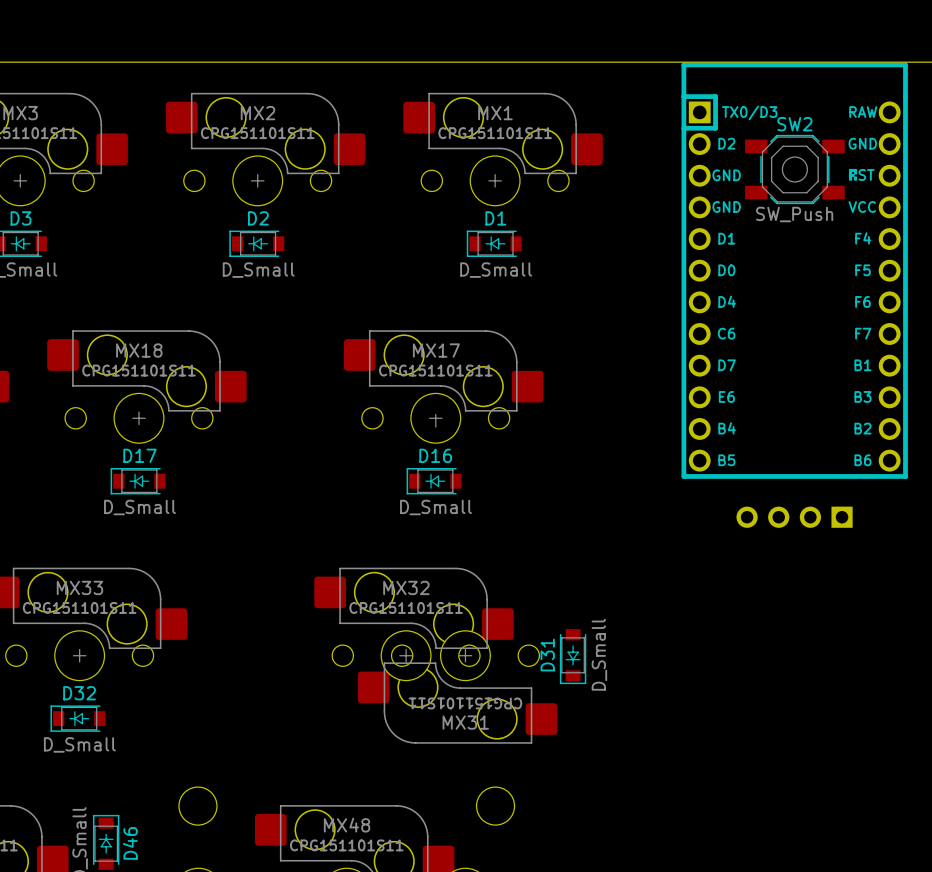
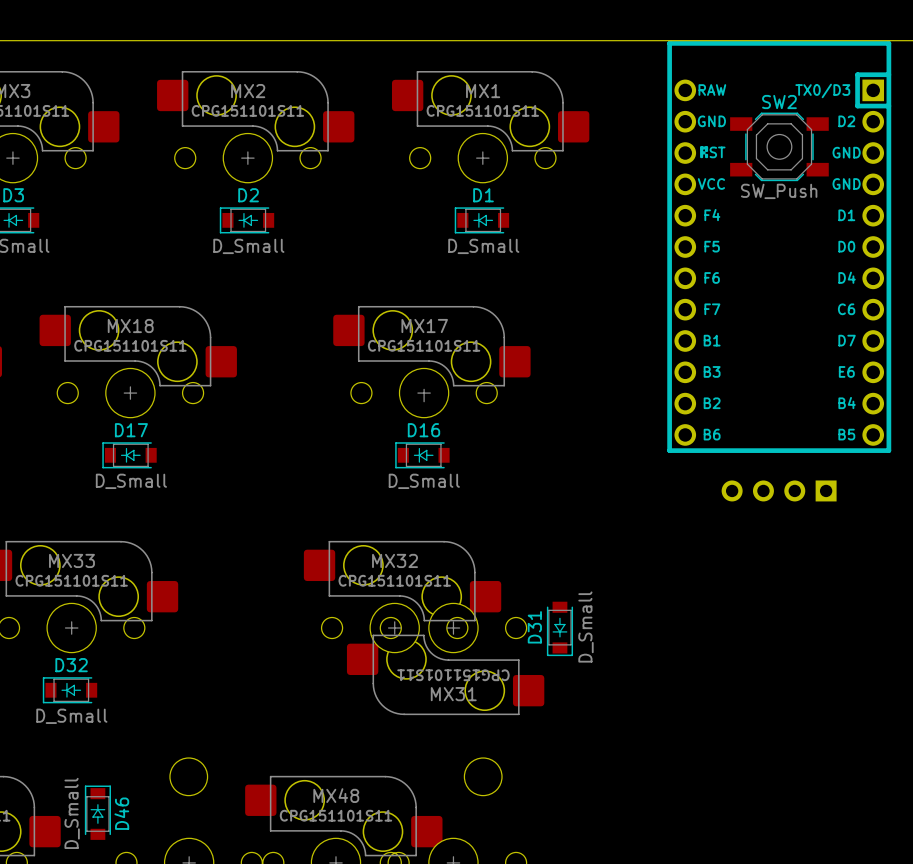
part side: top (794, 270) -> bottom (779, 247)

